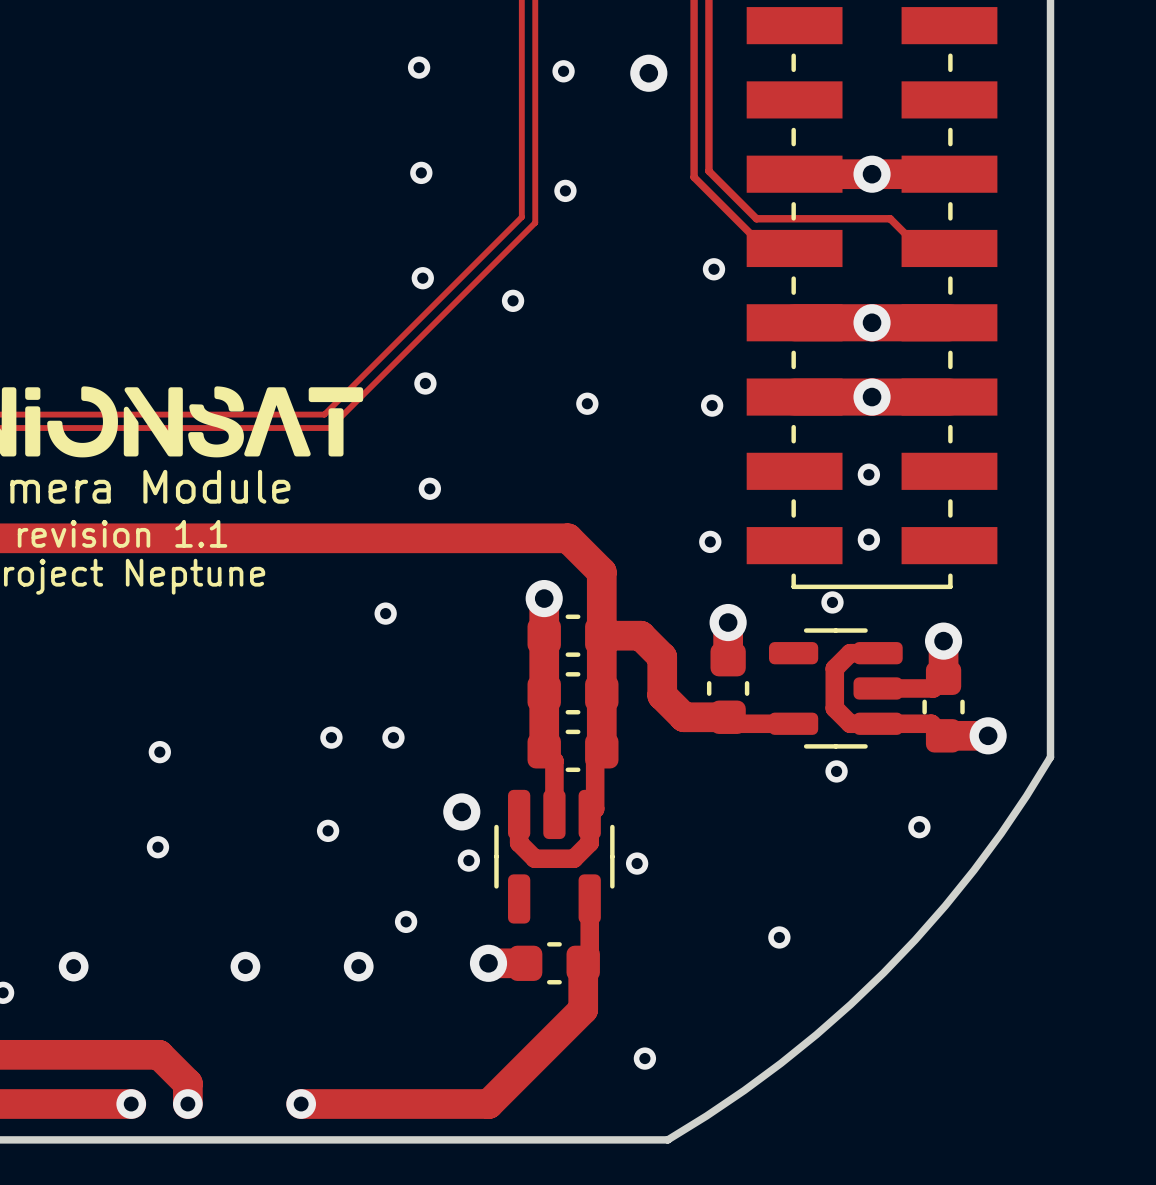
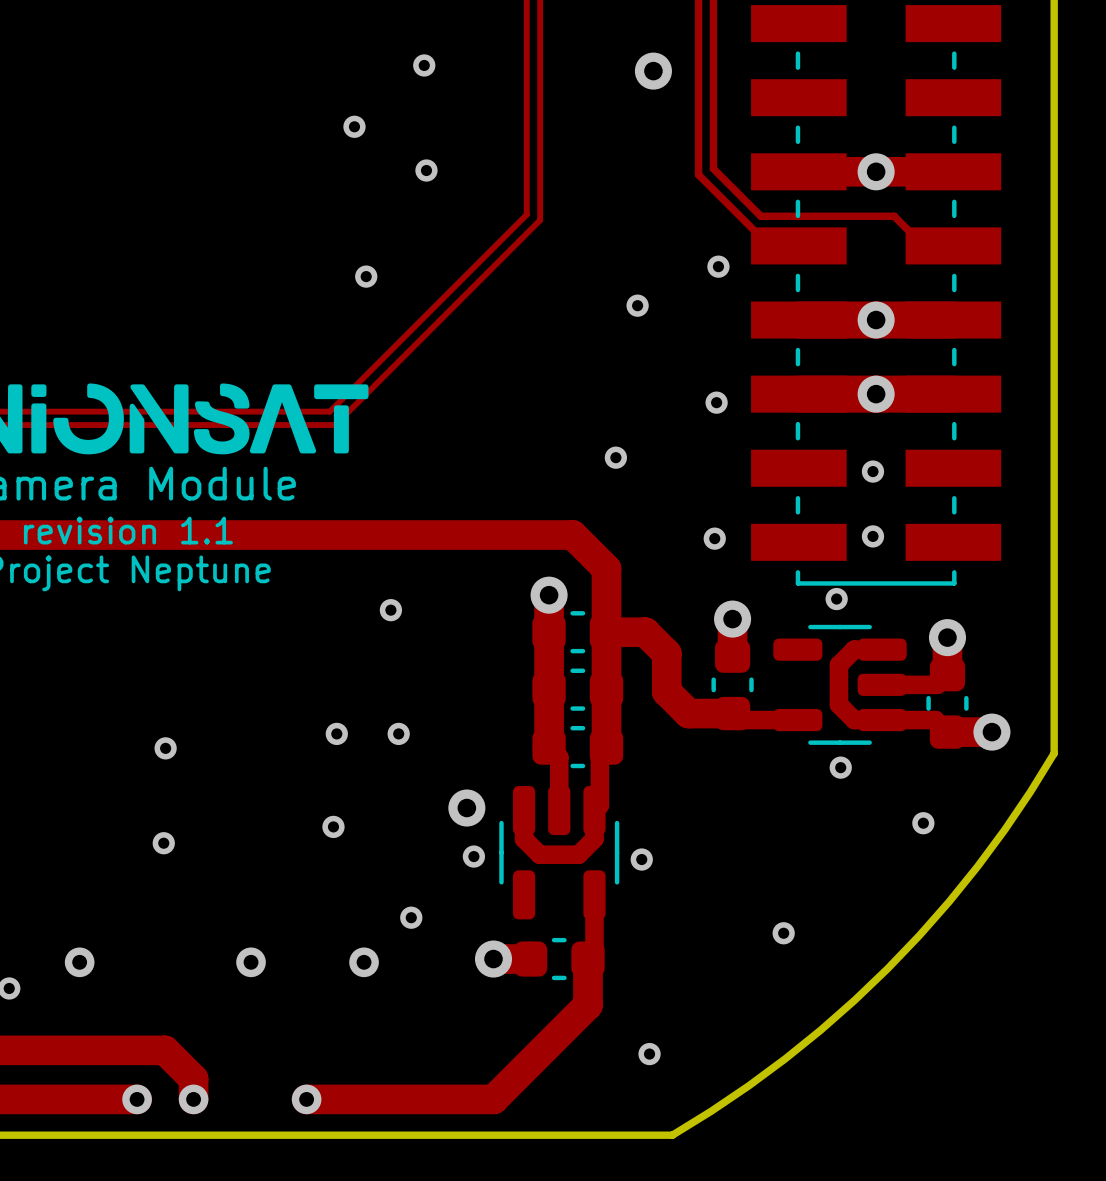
via: (563, 71) -> none
via: none -> (354, 126)
via: (565, 190) -> none
via: (422, 278) -> none
via: none -> (366, 276)
via: (513, 300) -> none
via: none -> (637, 305)
via: (425, 383) -> none
via: (587, 403) -> none
via: none -> (615, 457)
via: (429, 488) -> none

